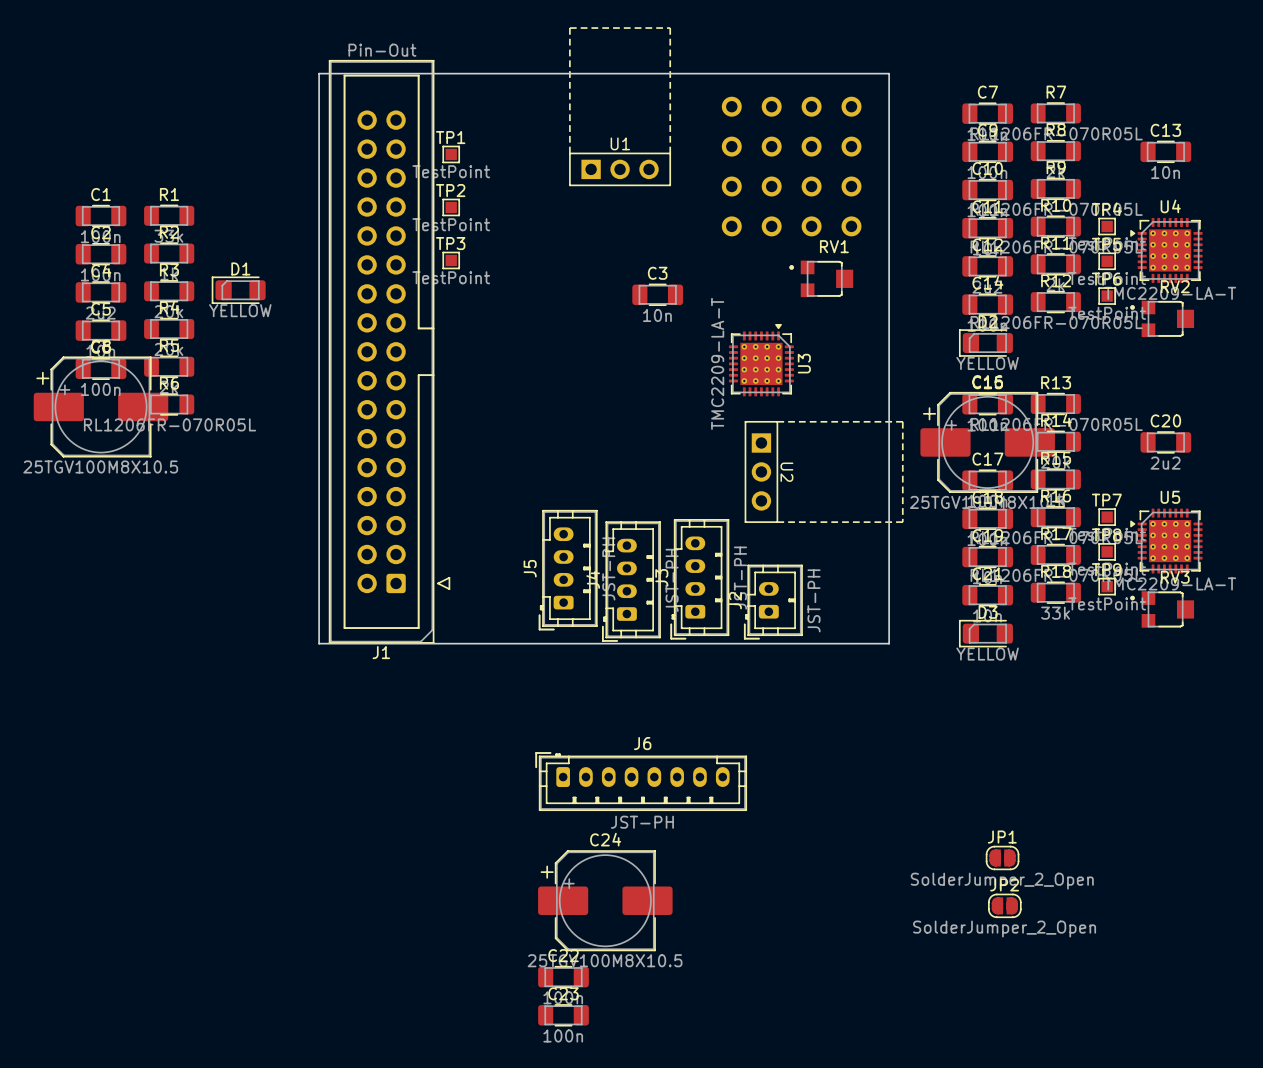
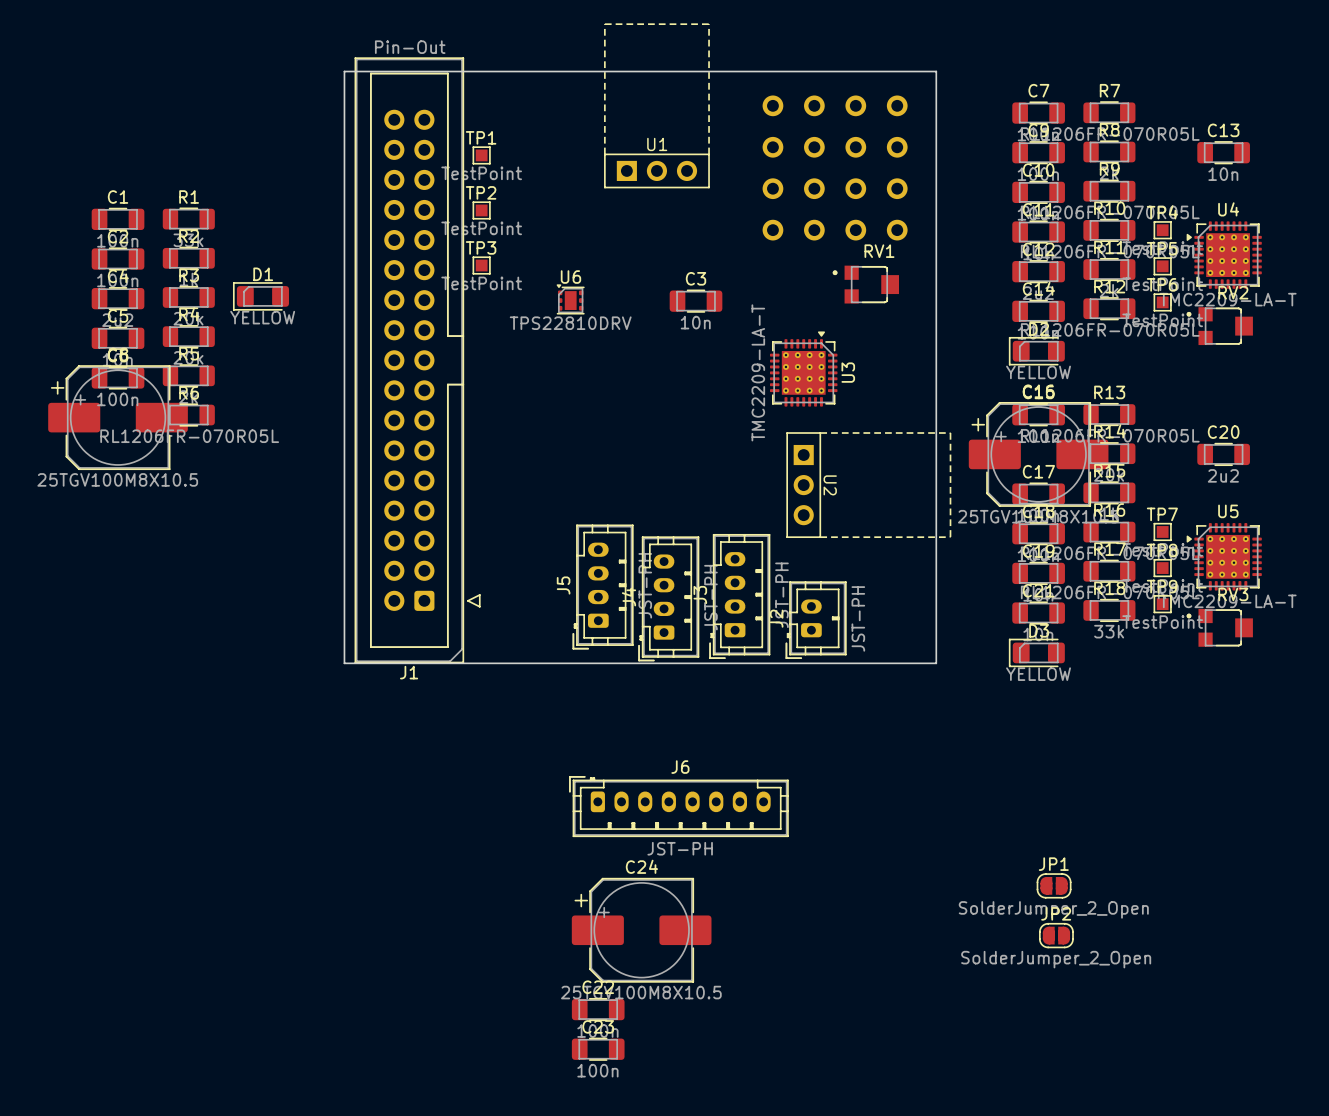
U6: none -> TPS22810DRV (570, 299)

